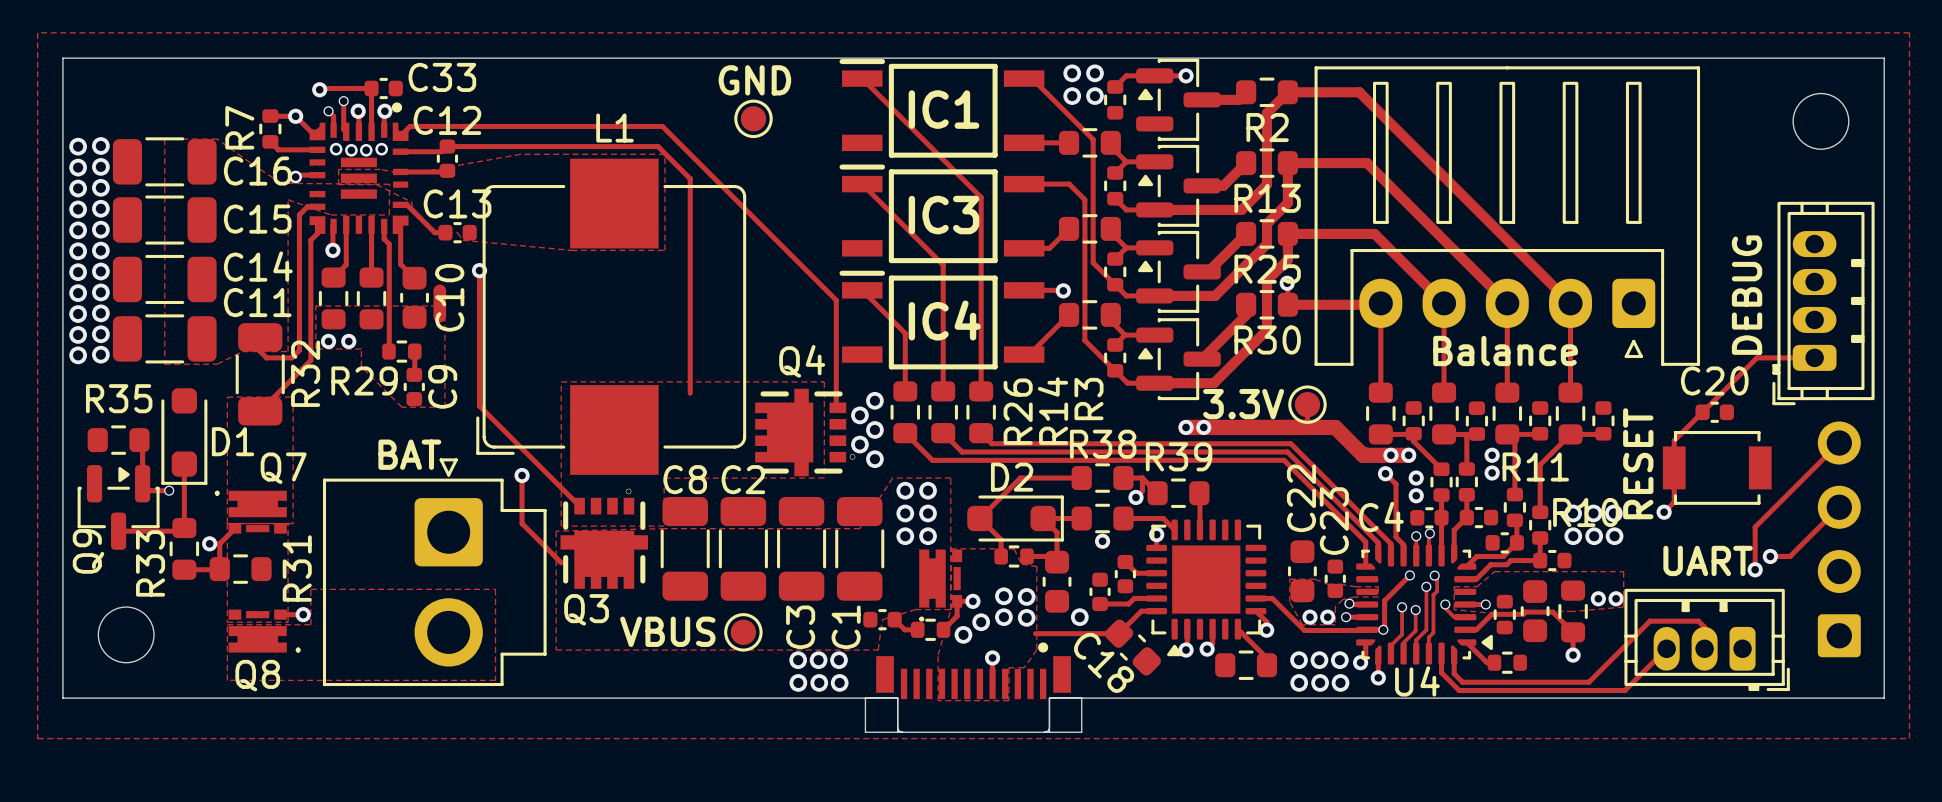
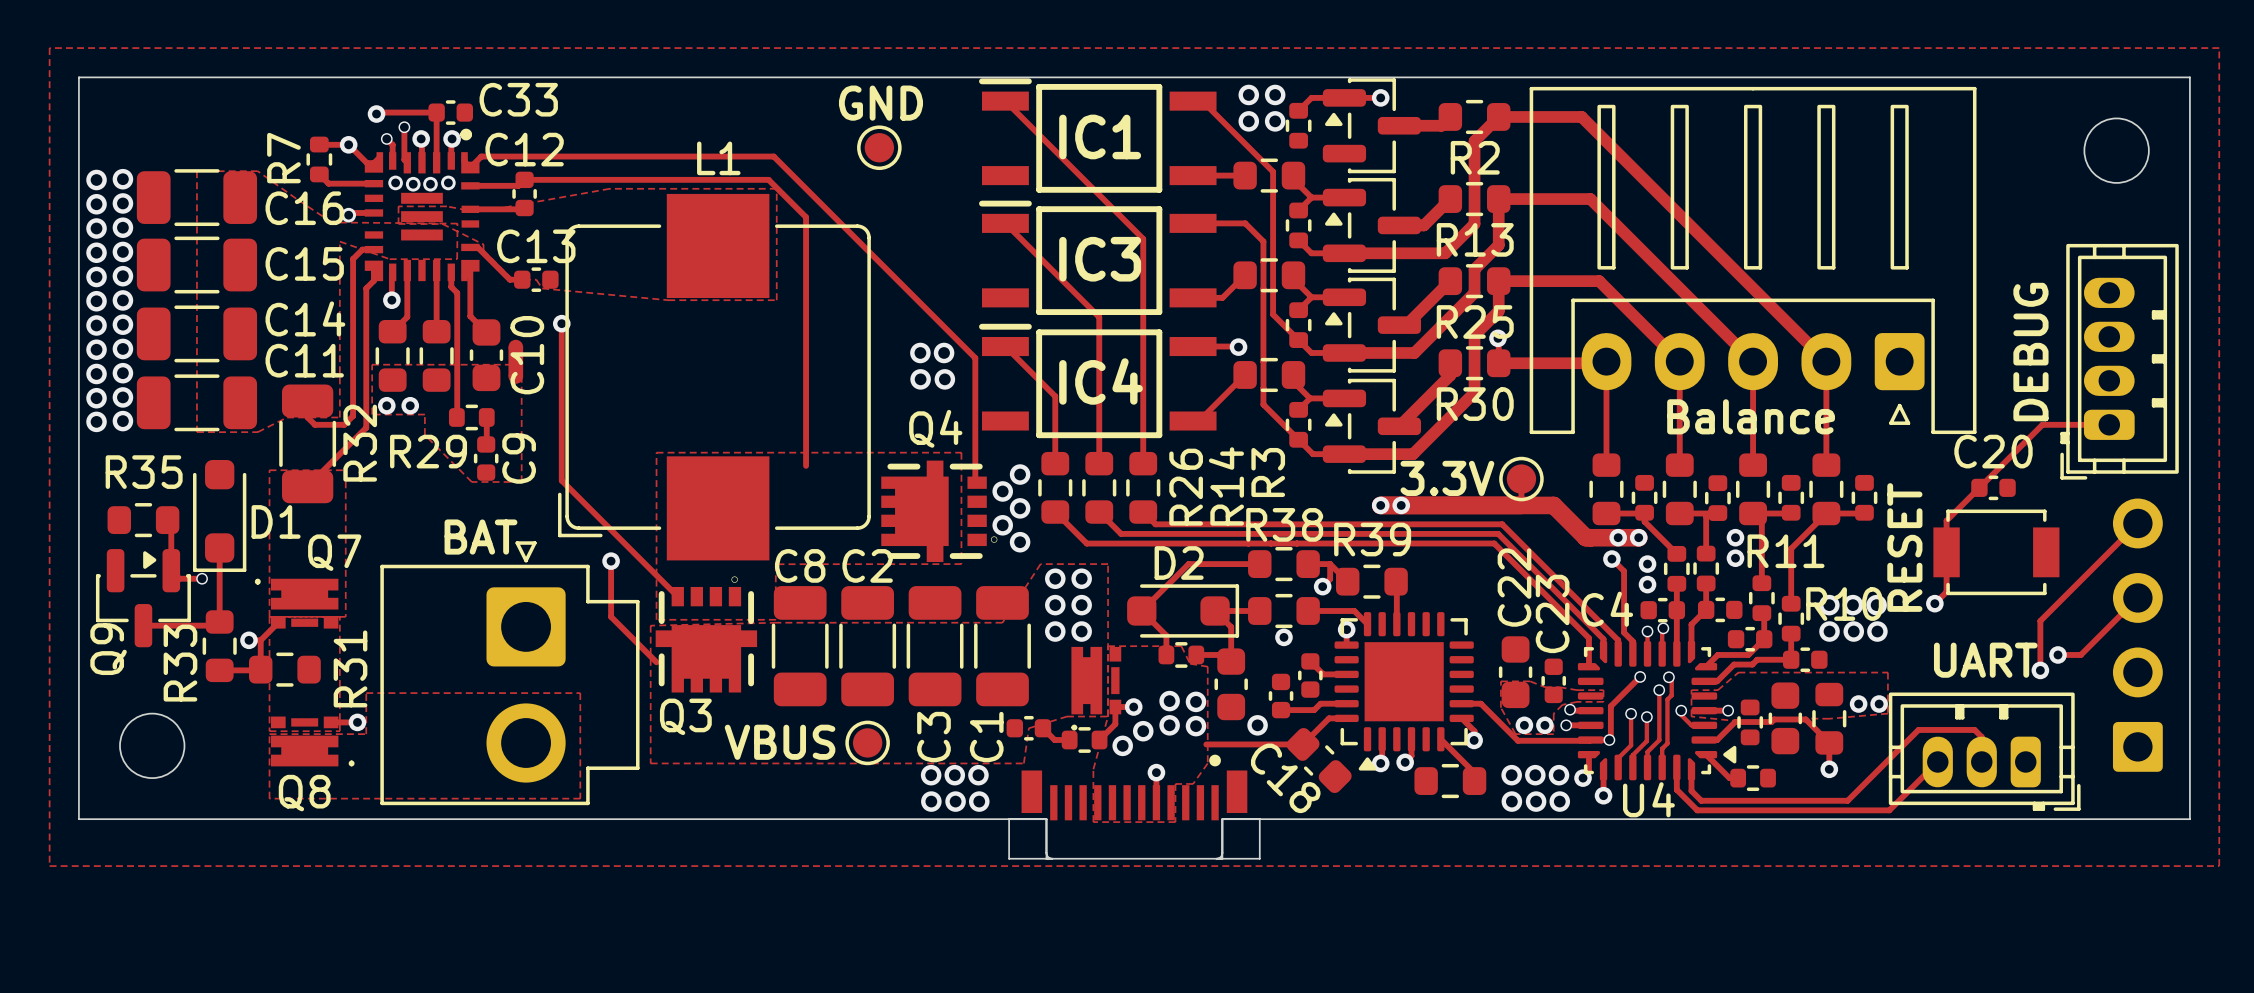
via: none -> (920, 352)
via: none -> (944, 352)
via: none -> (920, 379)
via: none -> (944, 379)

